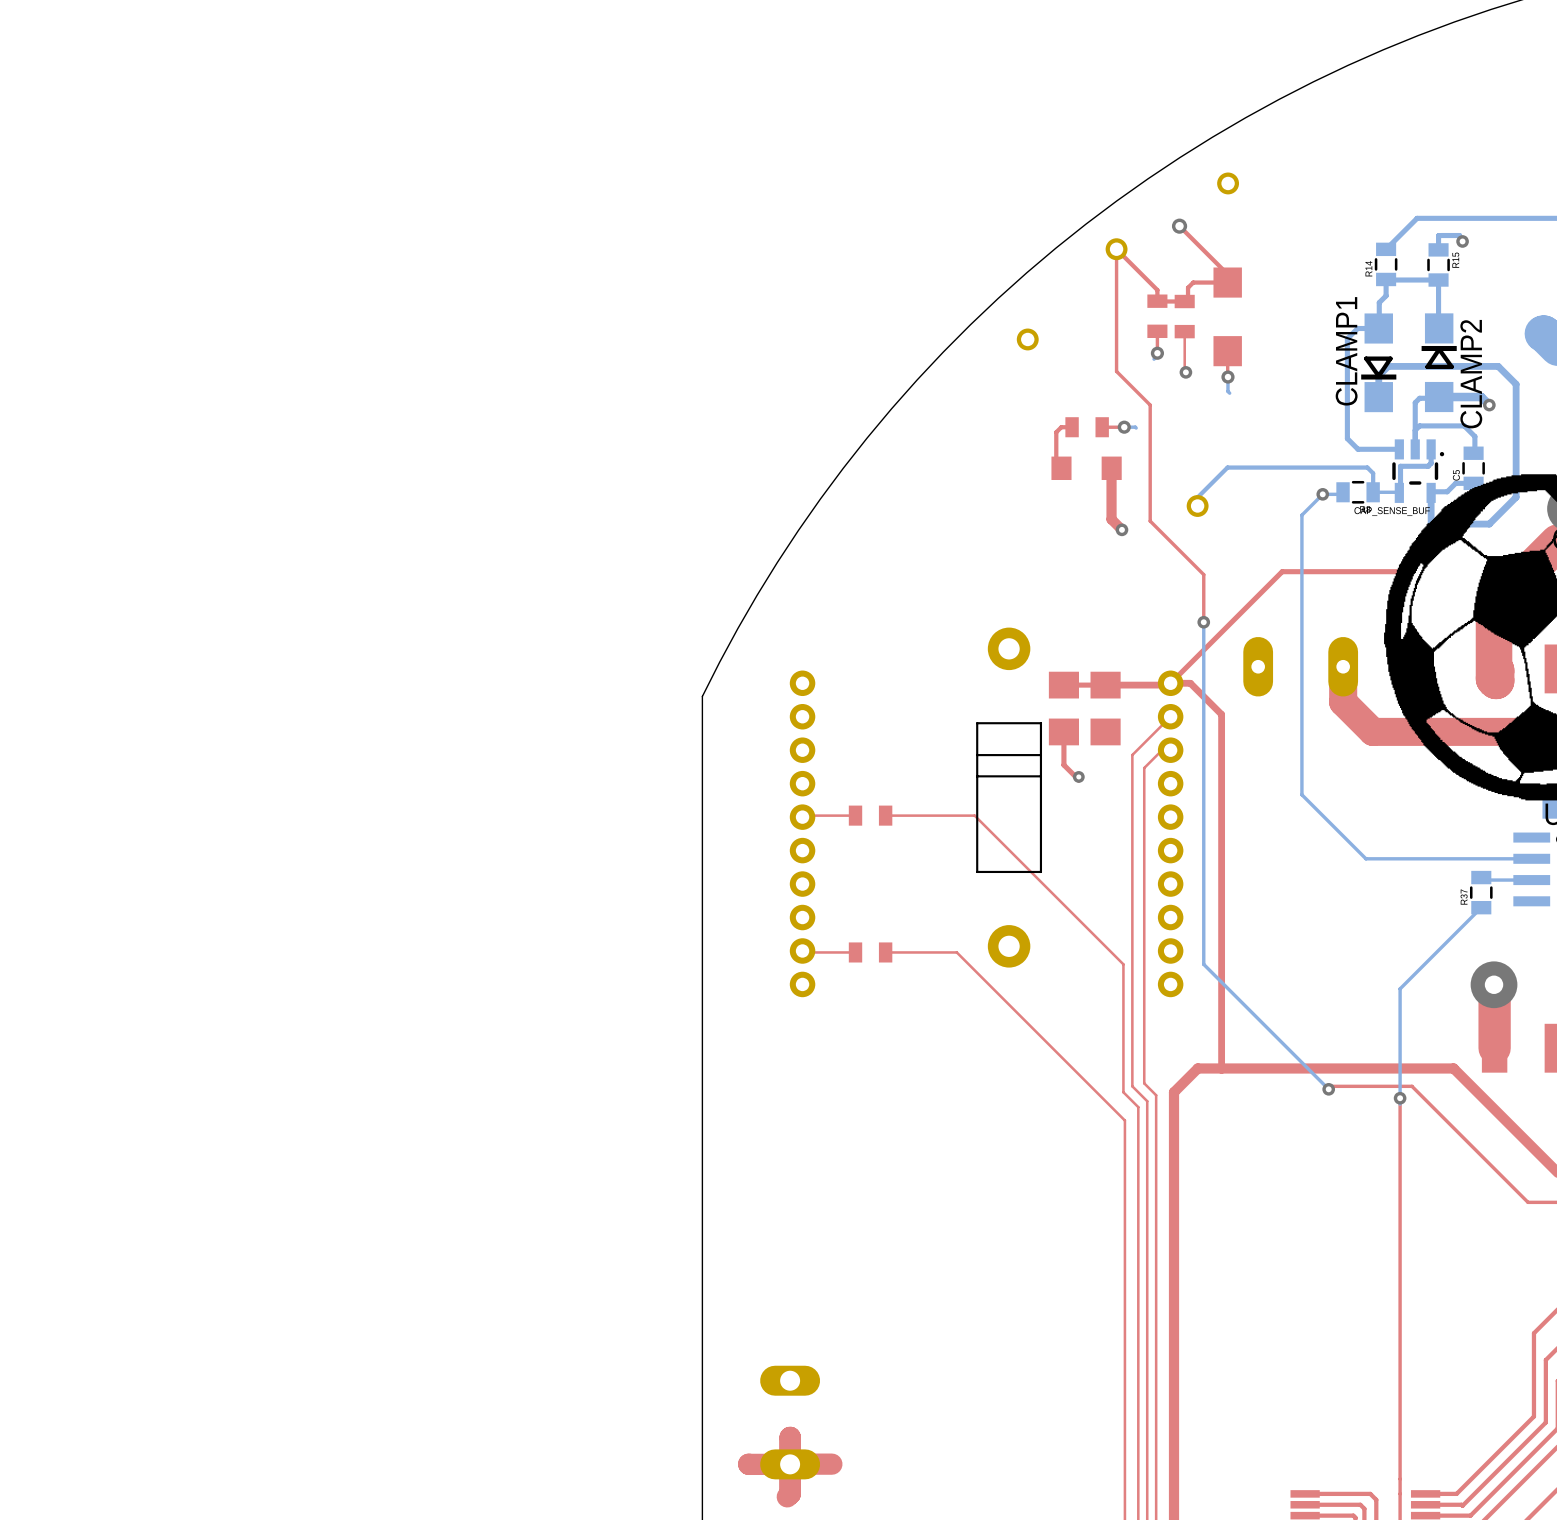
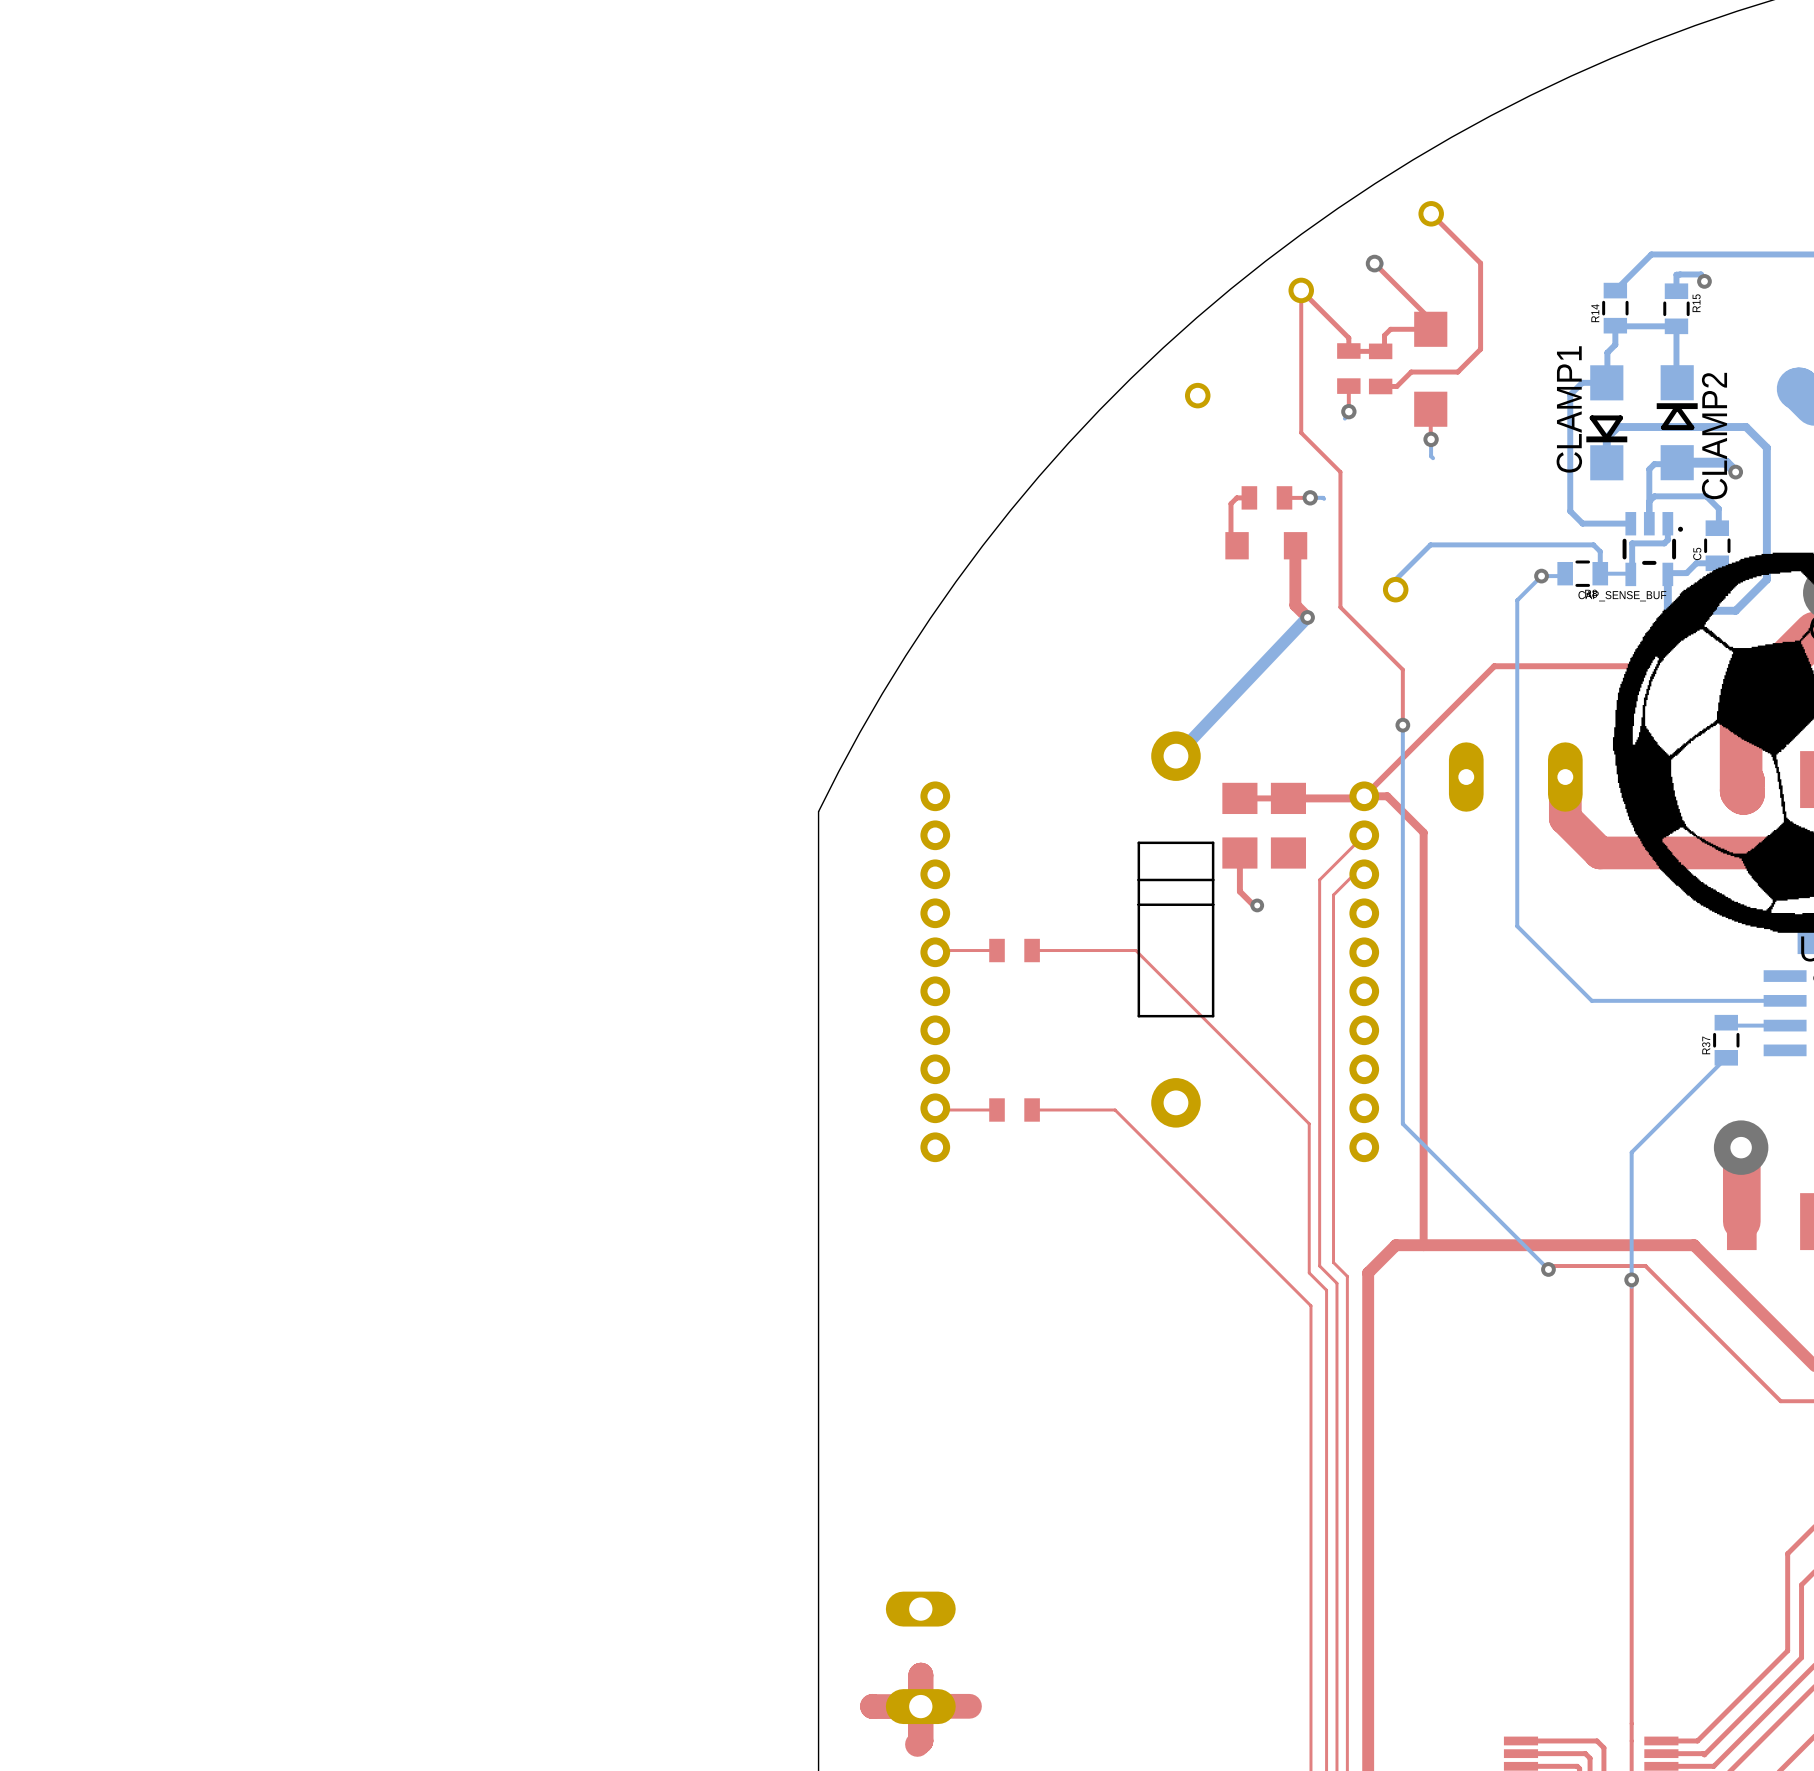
top track: (1184, 331) (1185, 372) -> (1380, 386) (1396, 386) (1411, 372) (1457, 372) (1480, 349) (1480, 263) (1431, 213)
via: (1185, 372) -> none
bottom track: none -> (1307, 617) (1175, 756)

